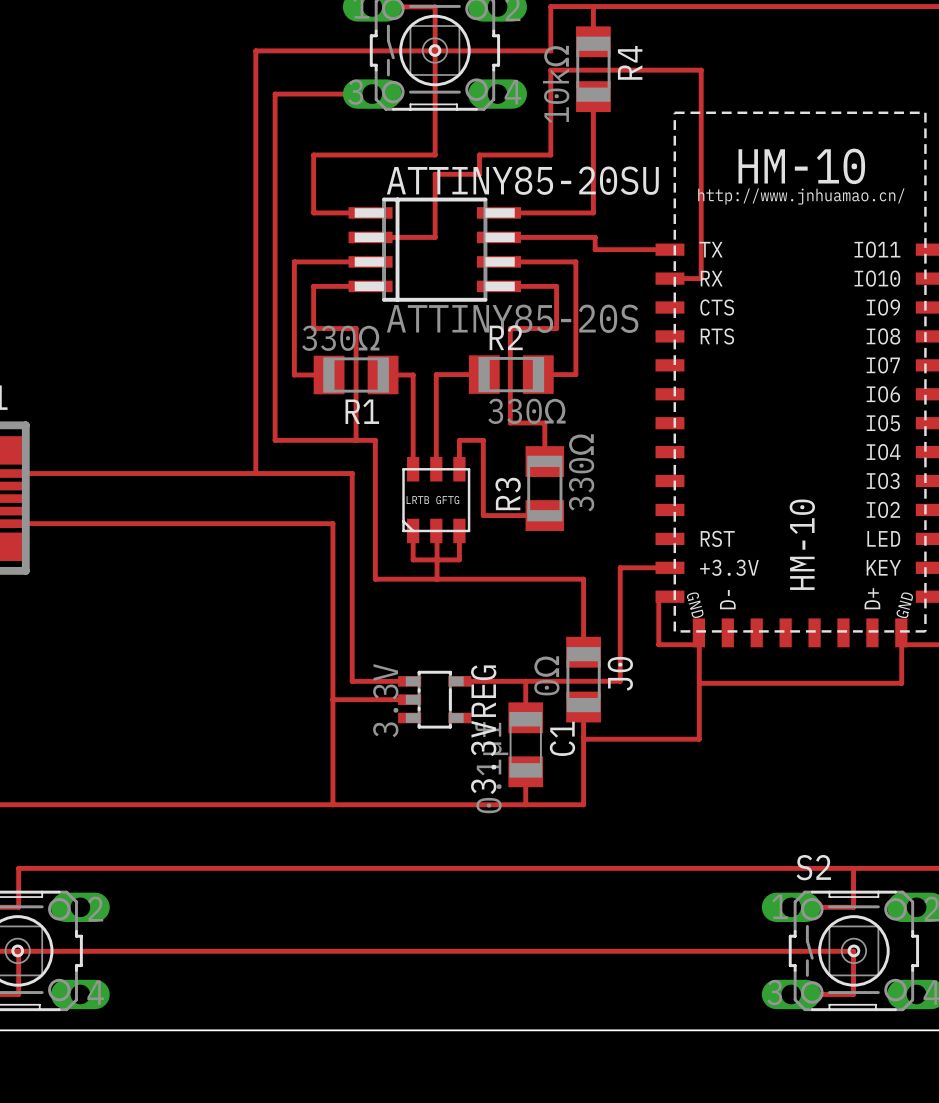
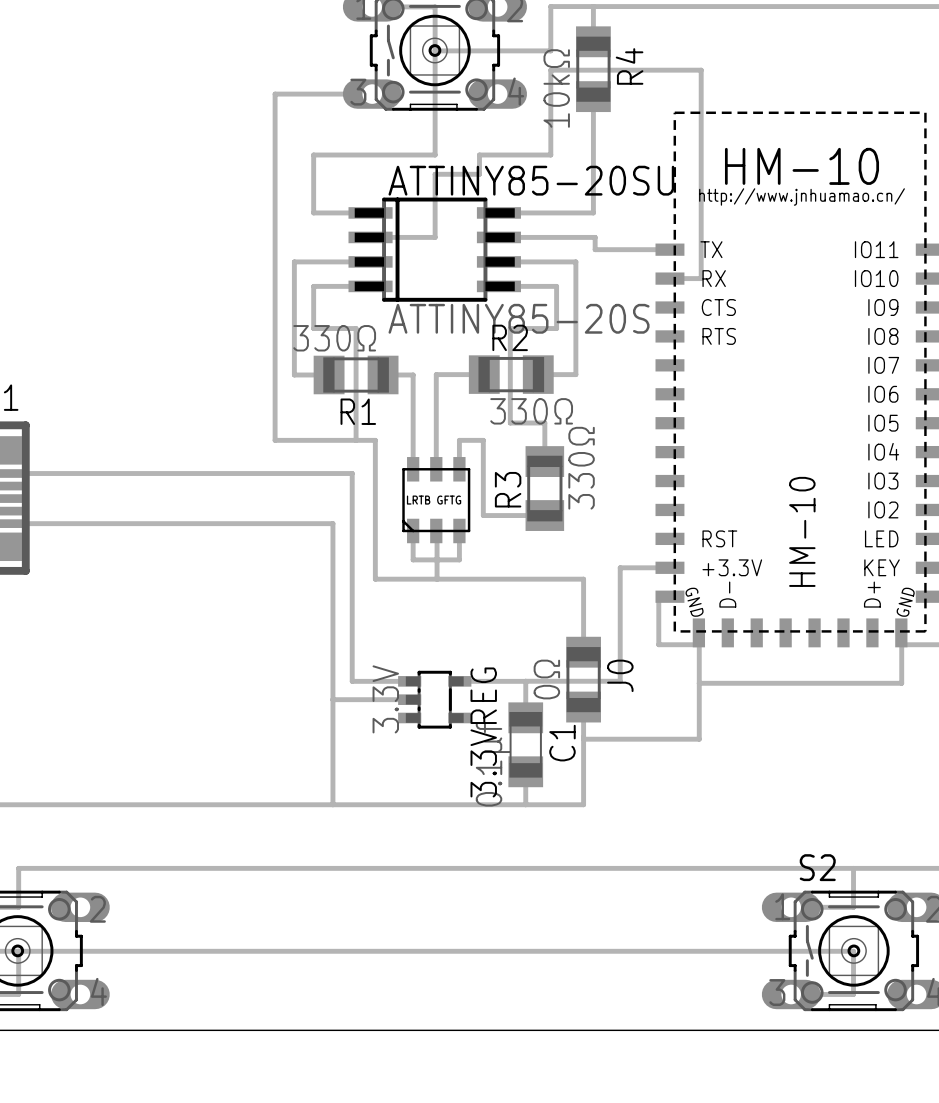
track: (435, 50) (255, 50) (255, 473) -> none

